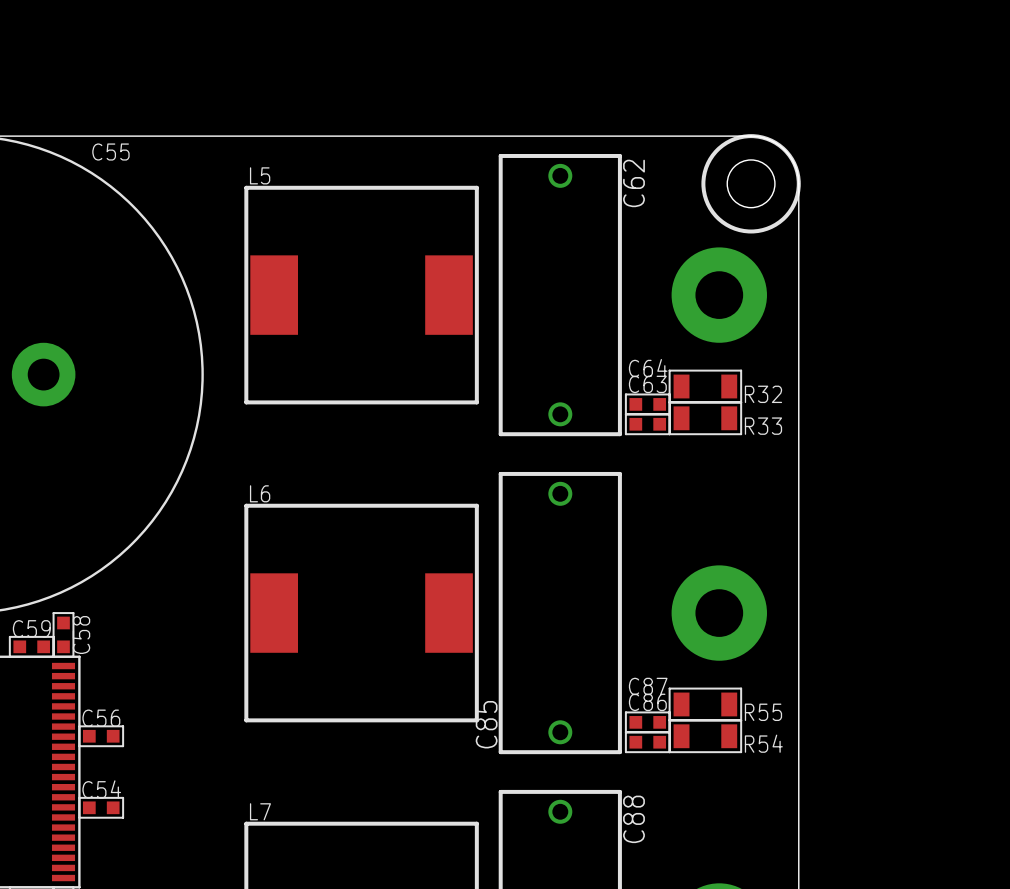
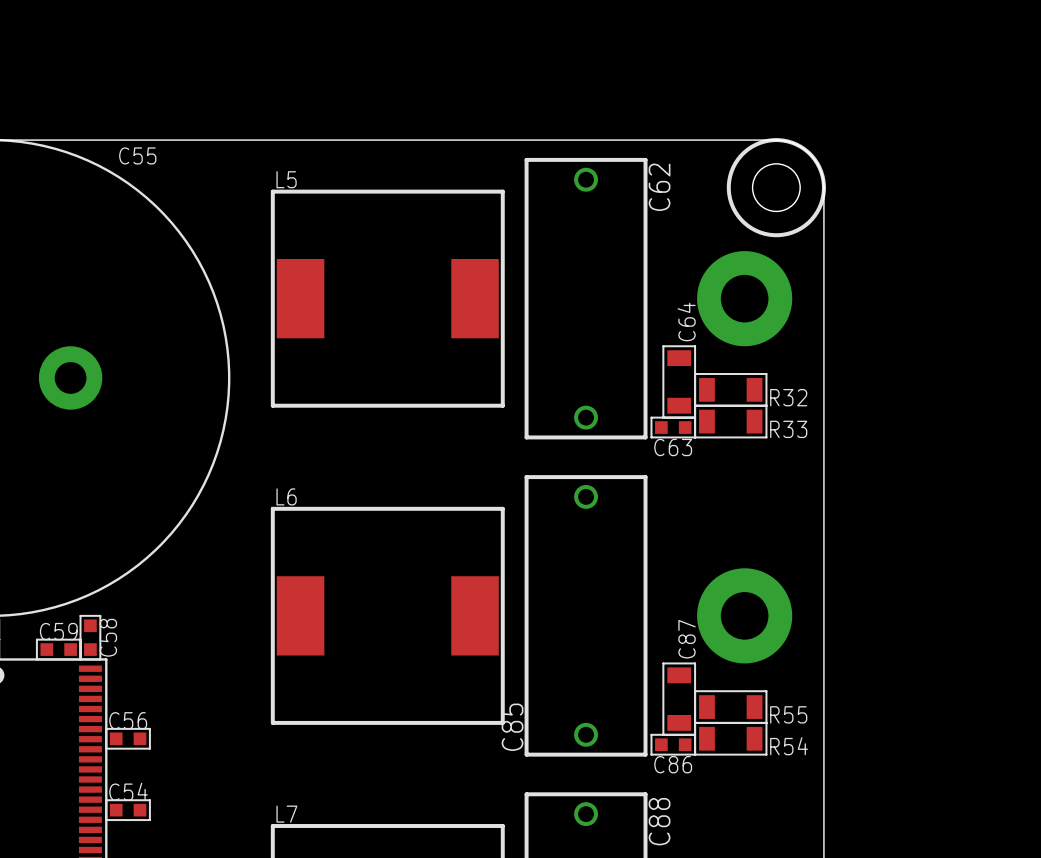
C63 name position: C63 (647, 384) -> C63 (673, 447)
C64 footprint: [624, 393, 671, 416] -> [662, 345, 697, 419]
C86 name position: C86 (647, 702) -> C86 (673, 764)
C87 footprint: [624, 711, 671, 734] -> [662, 662, 697, 736]

